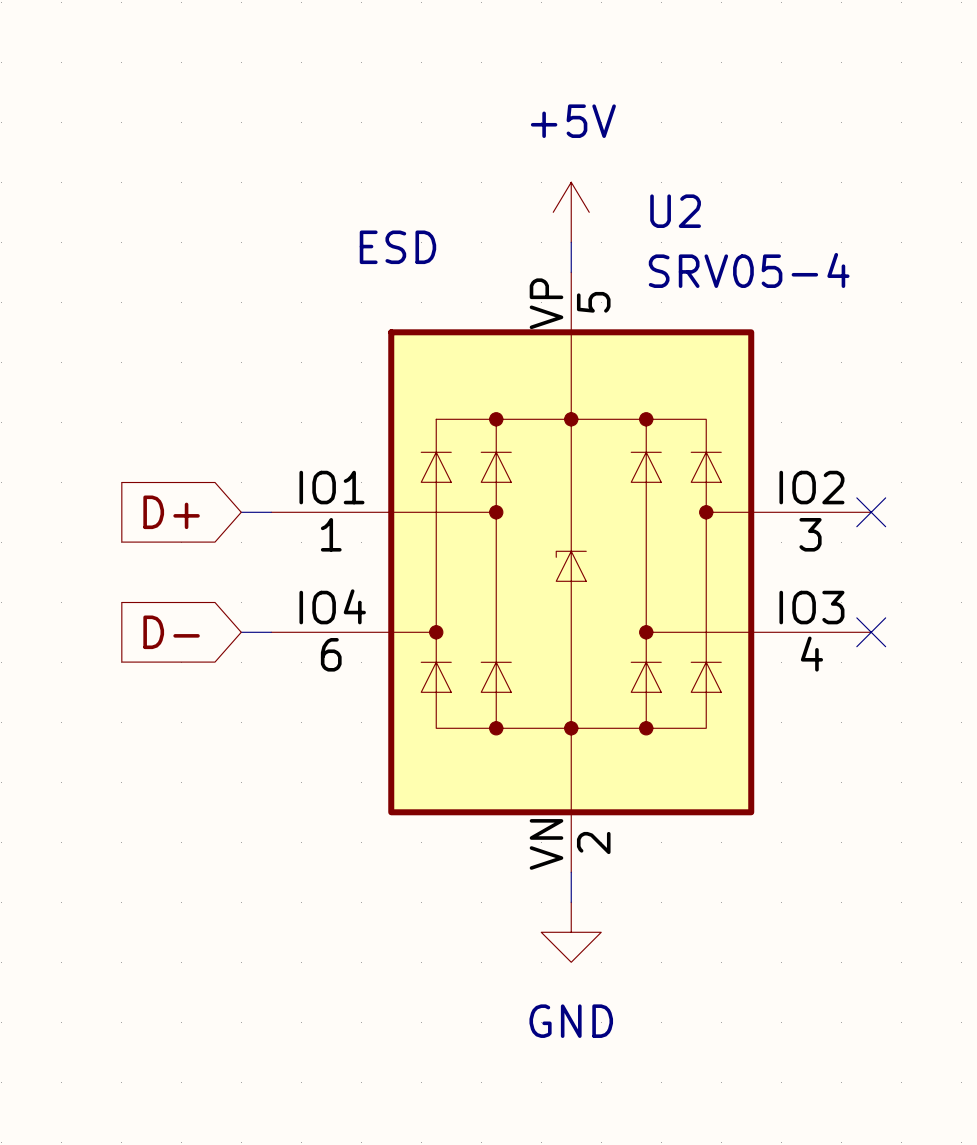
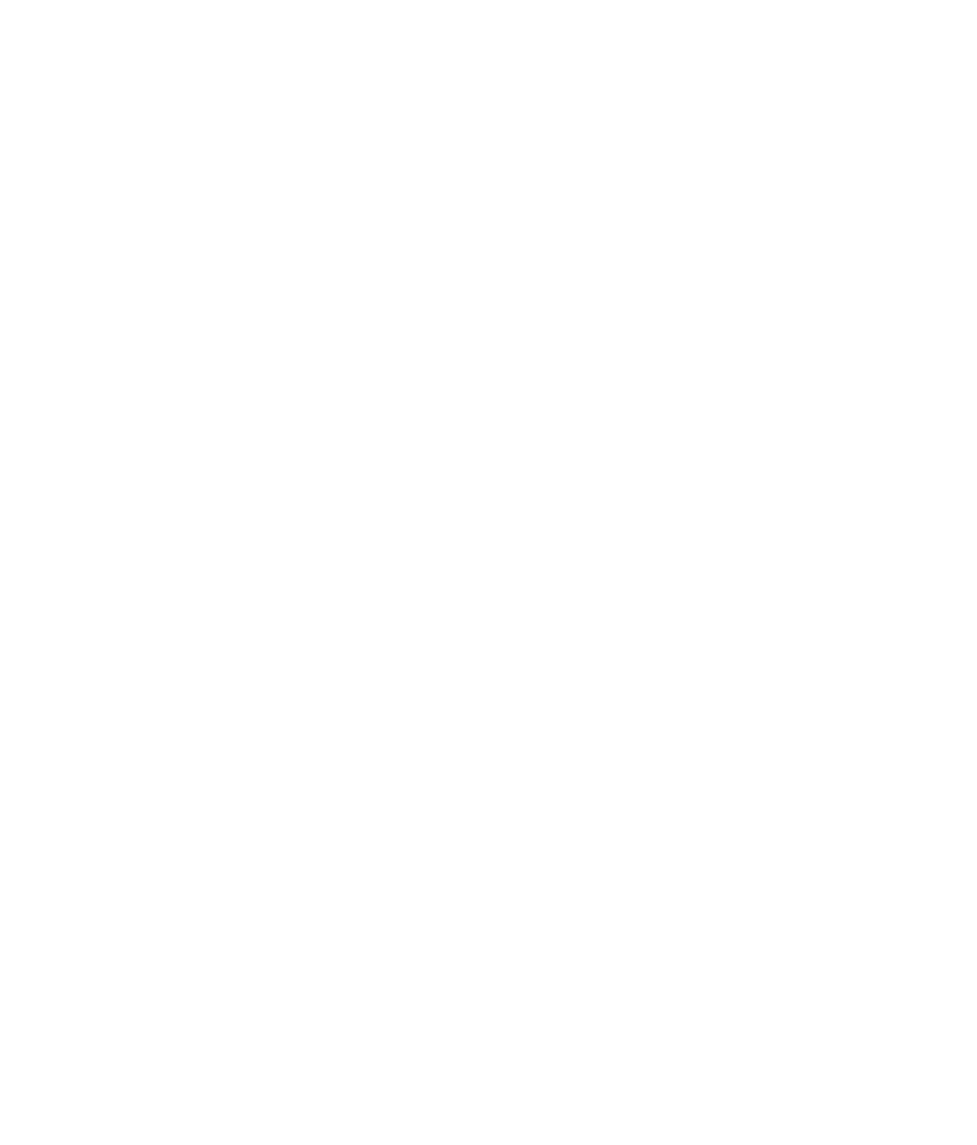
power symbol: +5V (571, 212) -> none
wire: (571, 242) (571, 272) -> none
text: ESD (397, 247) -> none
global label: D+ (171, 512) -> none
wire: (241, 512) (271, 512) -> none
no-connect mark: (871, 512) -> none
U2: SRV05-4 (571, 572) -> none
global label: D- (171, 632) -> none
wire: (241, 632) (271, 632) -> none
no-connect mark: (871, 632) -> none
wire: (571, 872) (571, 902) -> none
power symbol: GND (571, 932) -> none

